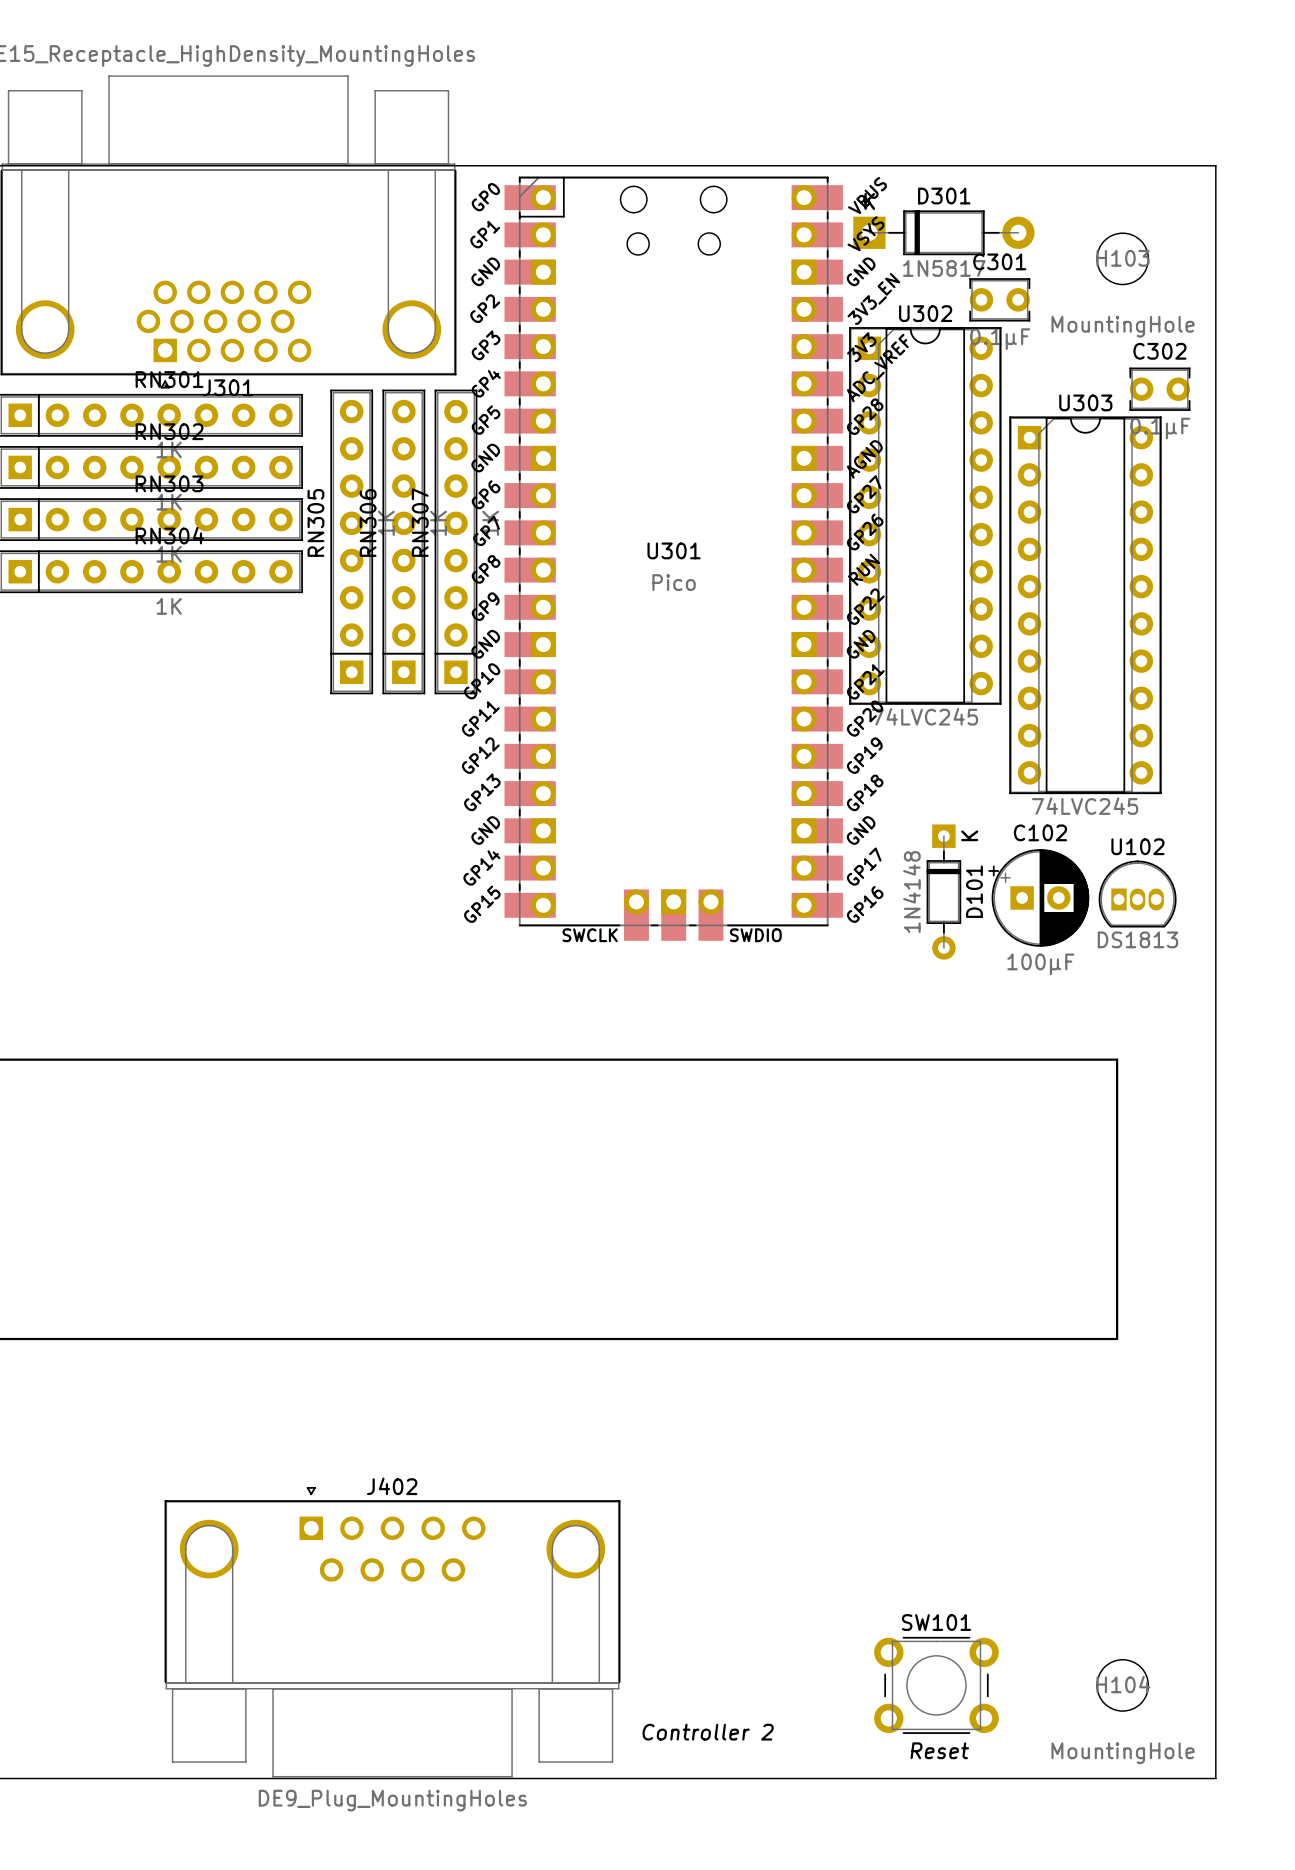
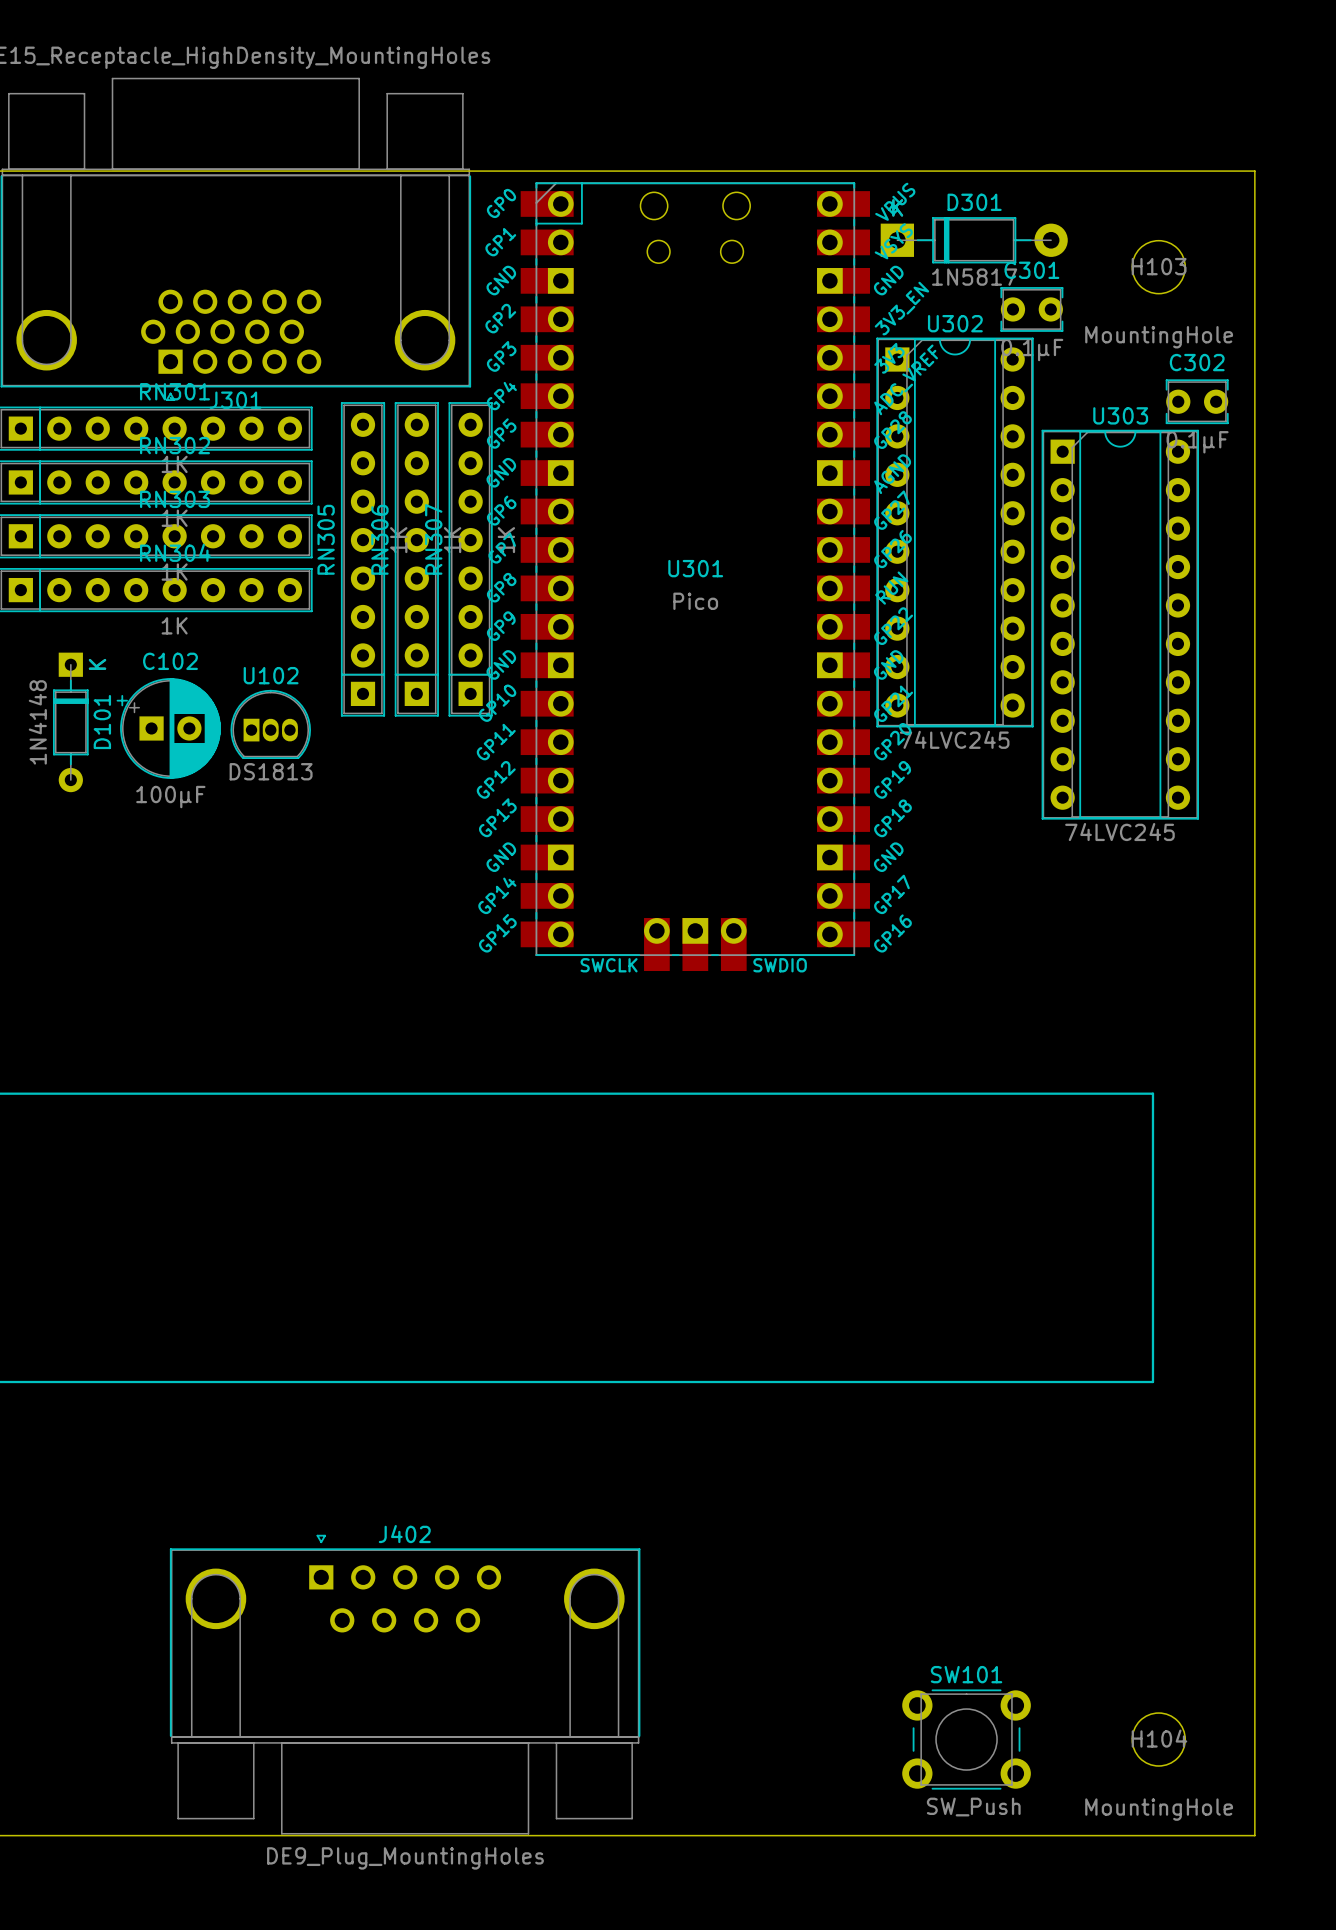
D101 position: (943, 892) -> (70, 722)
U102 position: (1137, 894) -> (270, 724)
C102 position: (1038, 897) -> (168, 728)
text: Controller 2 (708, 1732) -> none
text: Reset (939, 1750) -> none
SW101 value: none -> SW_Push (973, 1807)

